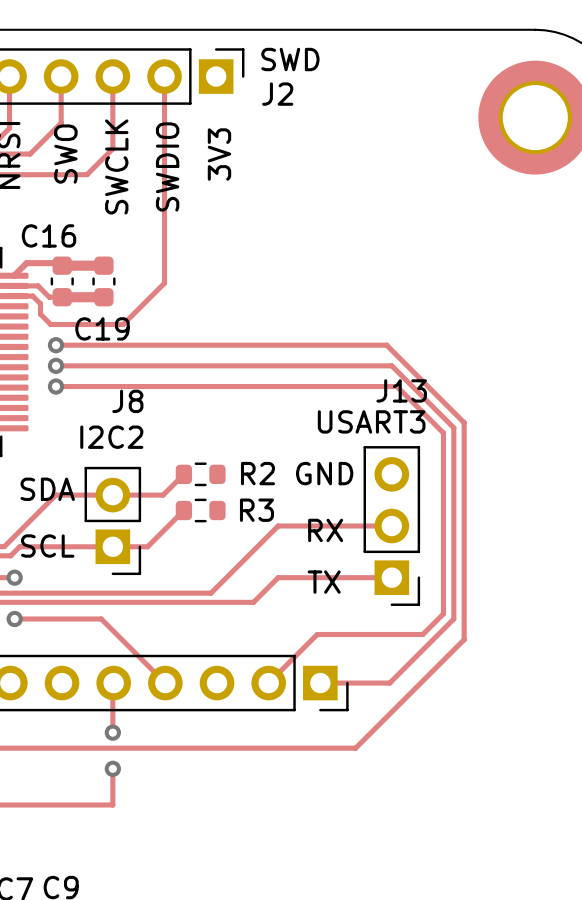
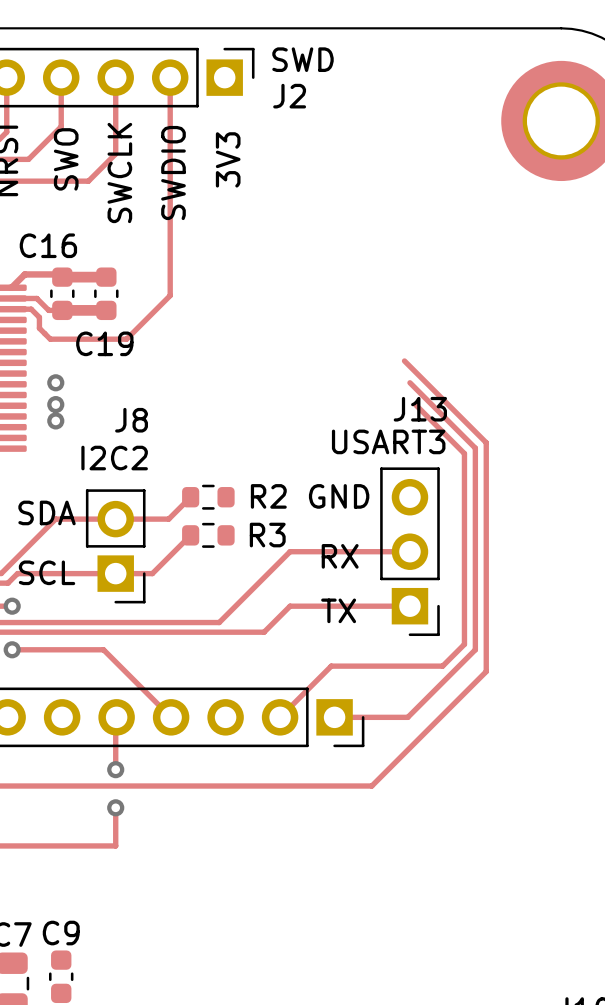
track: (56, 345) (386, 345) -> none
via: (56, 345) -> none
track: (56, 365) (391, 365) -> none
track: (56, 386) (396, 386) -> none
via: none -> (55, 420)

